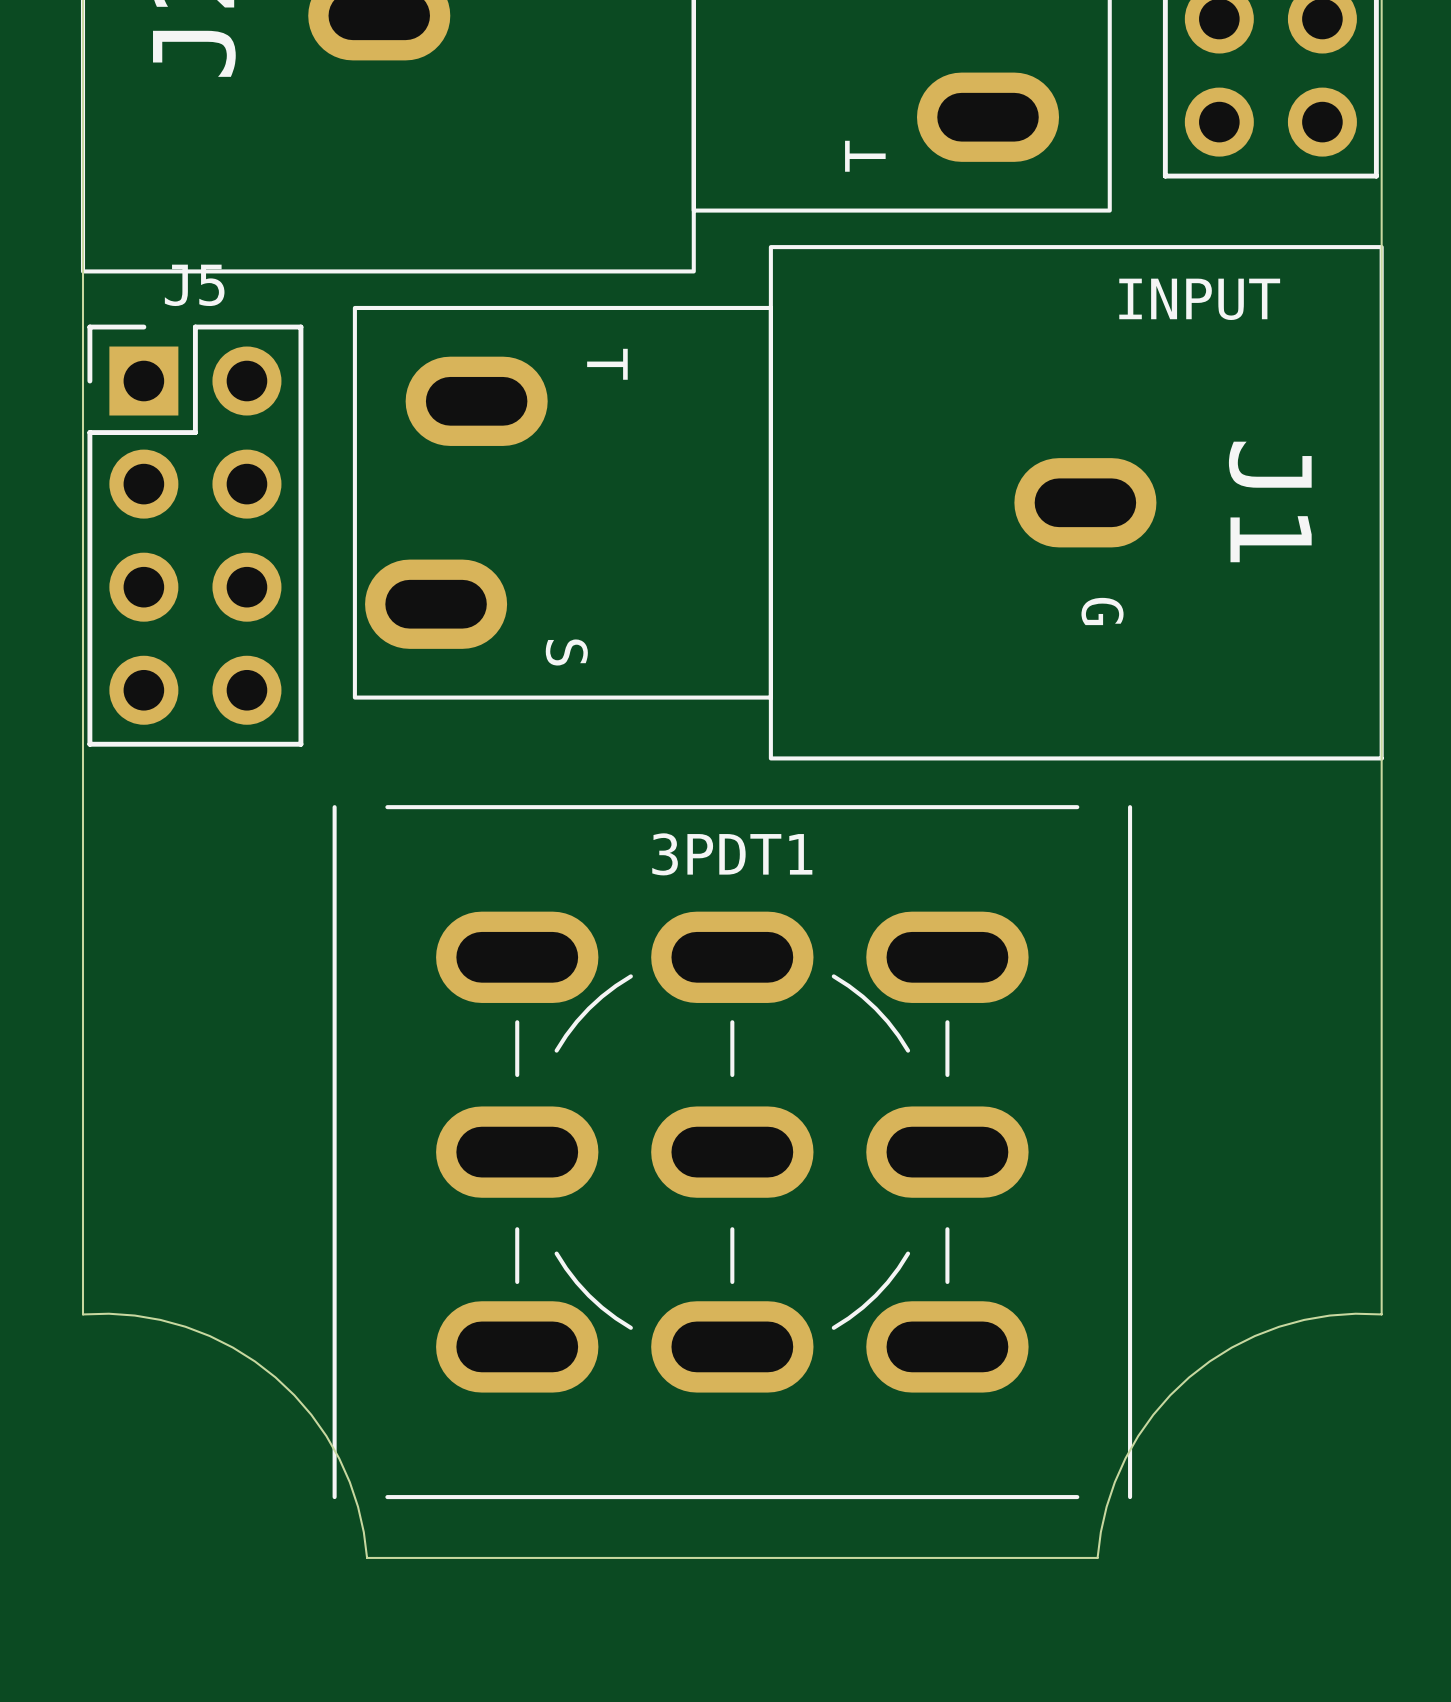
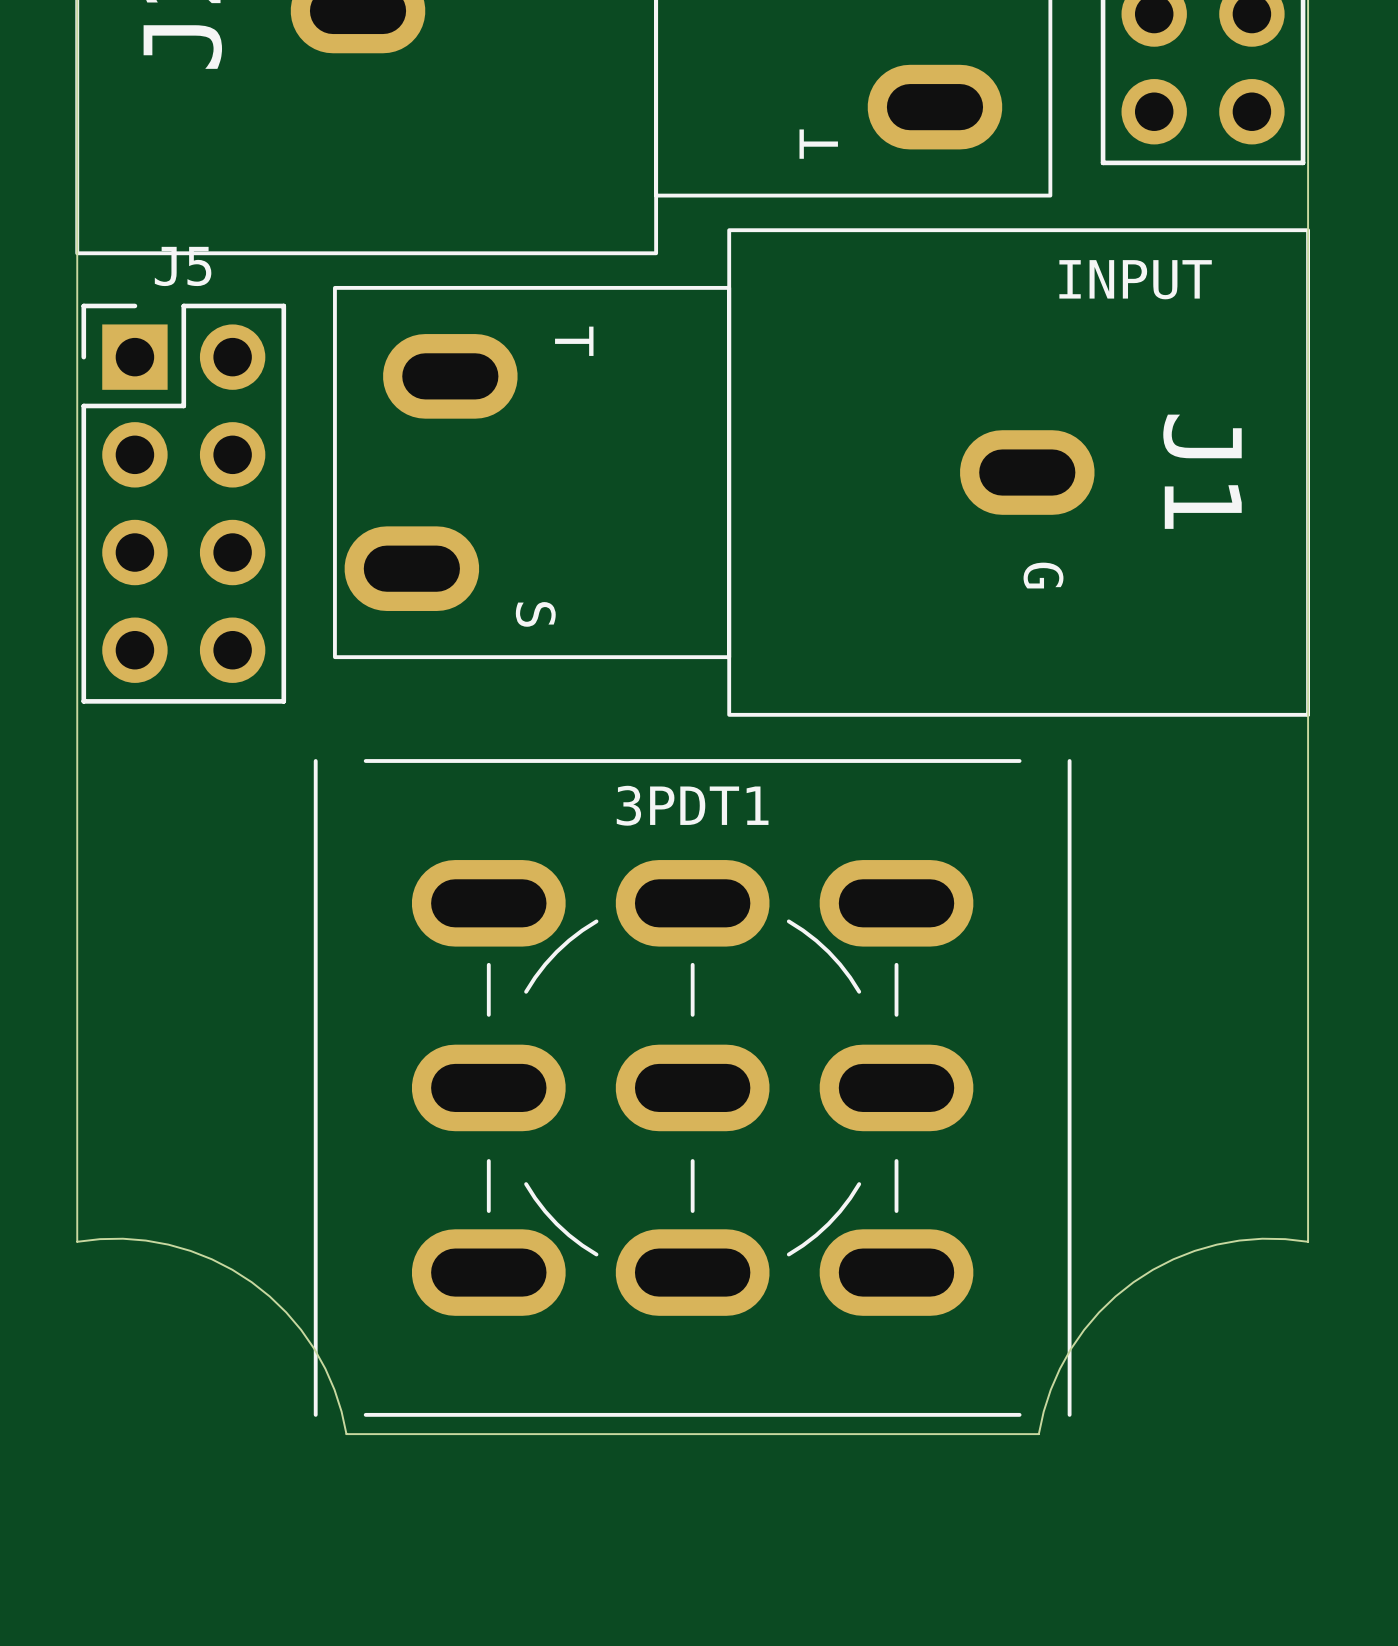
board edge: (83, 1314) (134, 1315) (185, 1326) (232, 1347) (275, 1377) (311, 1414) (339, 1458) (358, 1506) (367, 1557) (1097, 1557) (1106, 1506) (1125, 1458) (1153, 1414) (1189, 1377) (1231, 1347) (1279, 1326) (1329, 1315) (1381, 1314) -> (77, 1241) (123, 1238) (168, 1244) (211, 1259) (251, 1282) (286, 1312) (314, 1348) (334, 1389) (346, 1434) (1038, 1434) (1050, 1389) (1071, 1348) (1099, 1312) (1133, 1282) (1173, 1259) (1216, 1244) (1262, 1238) (1308, 1241)

